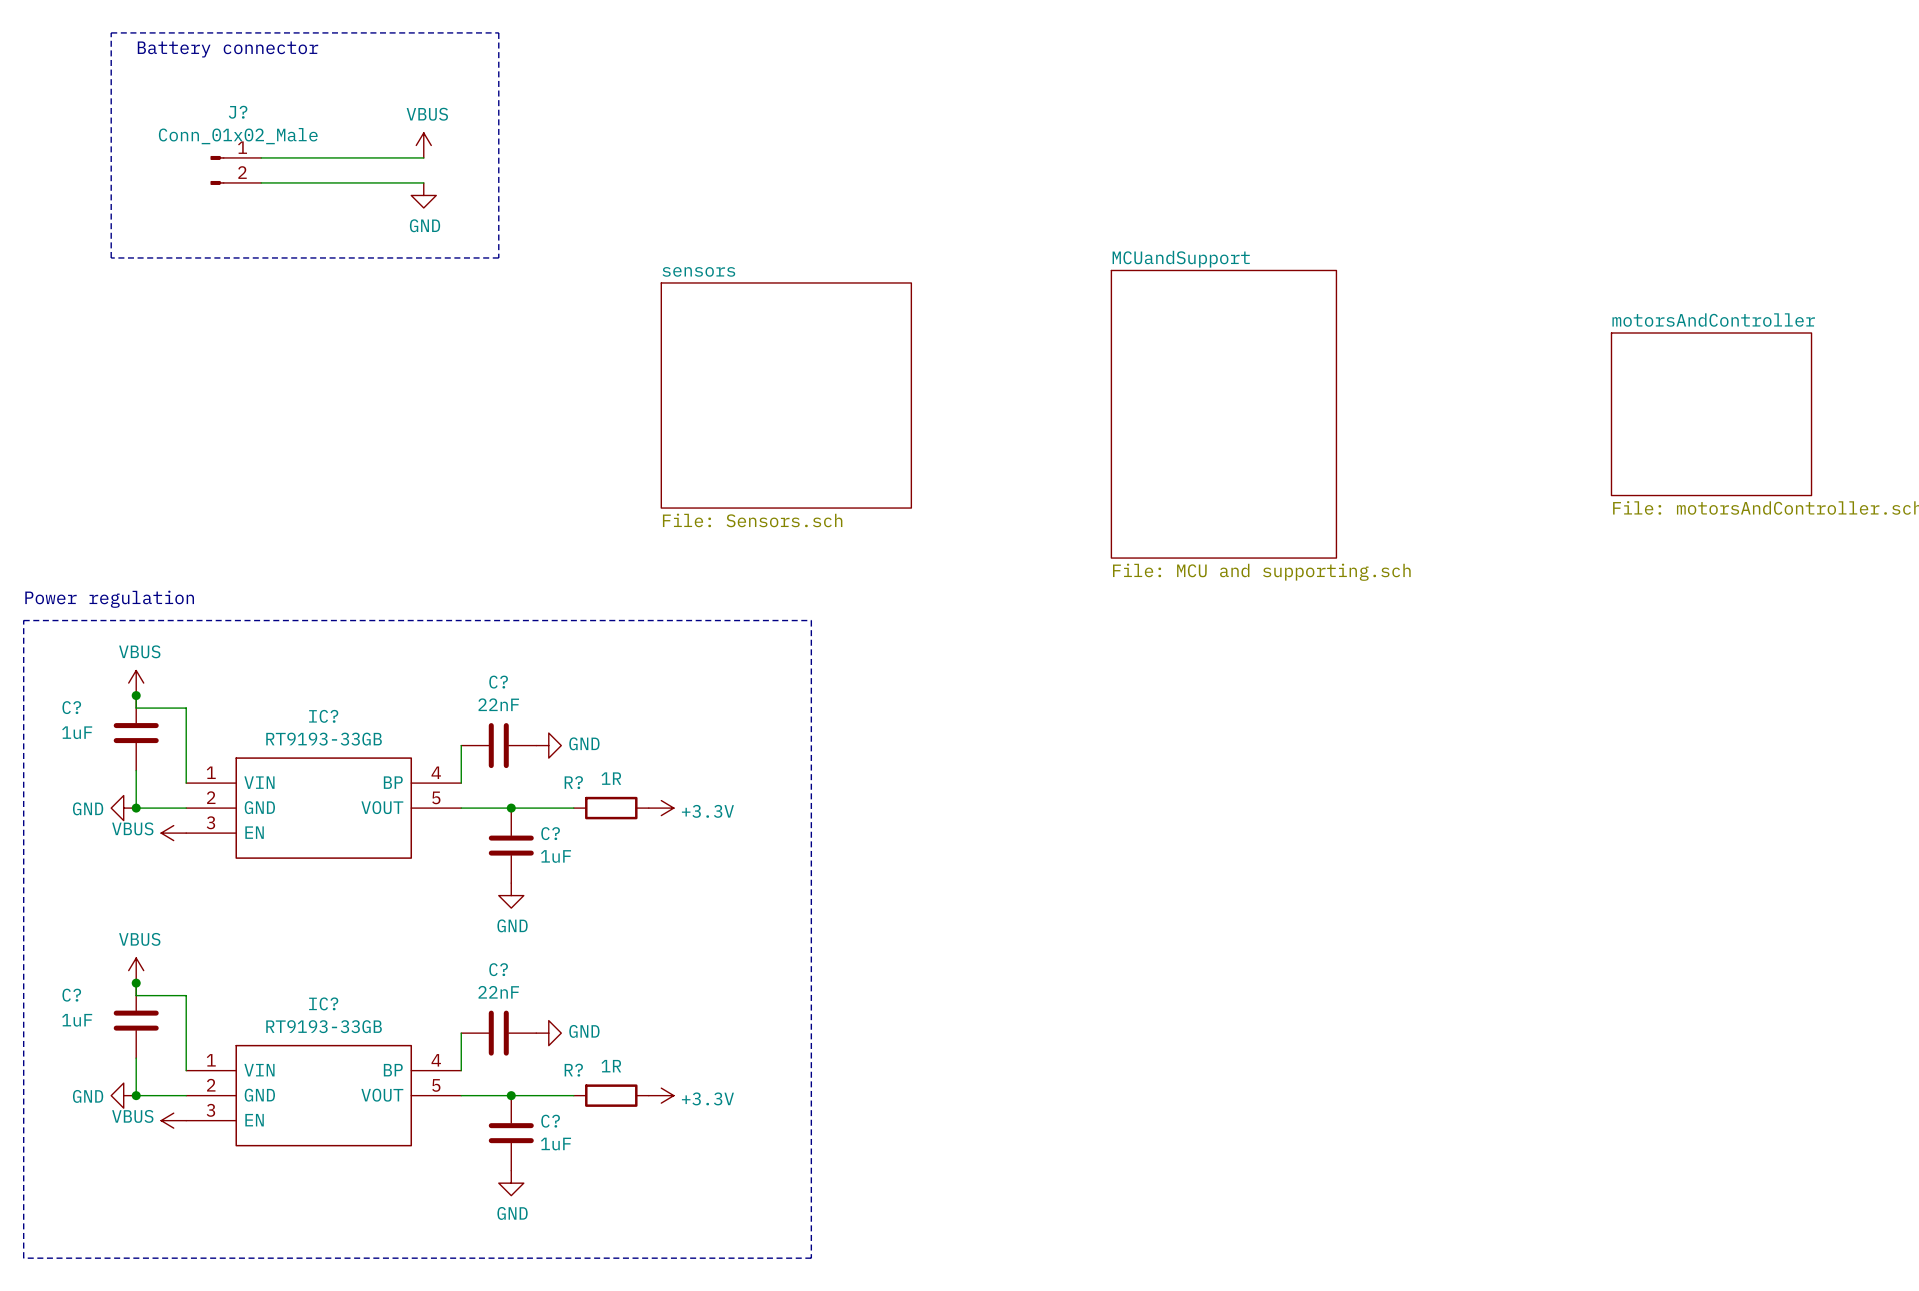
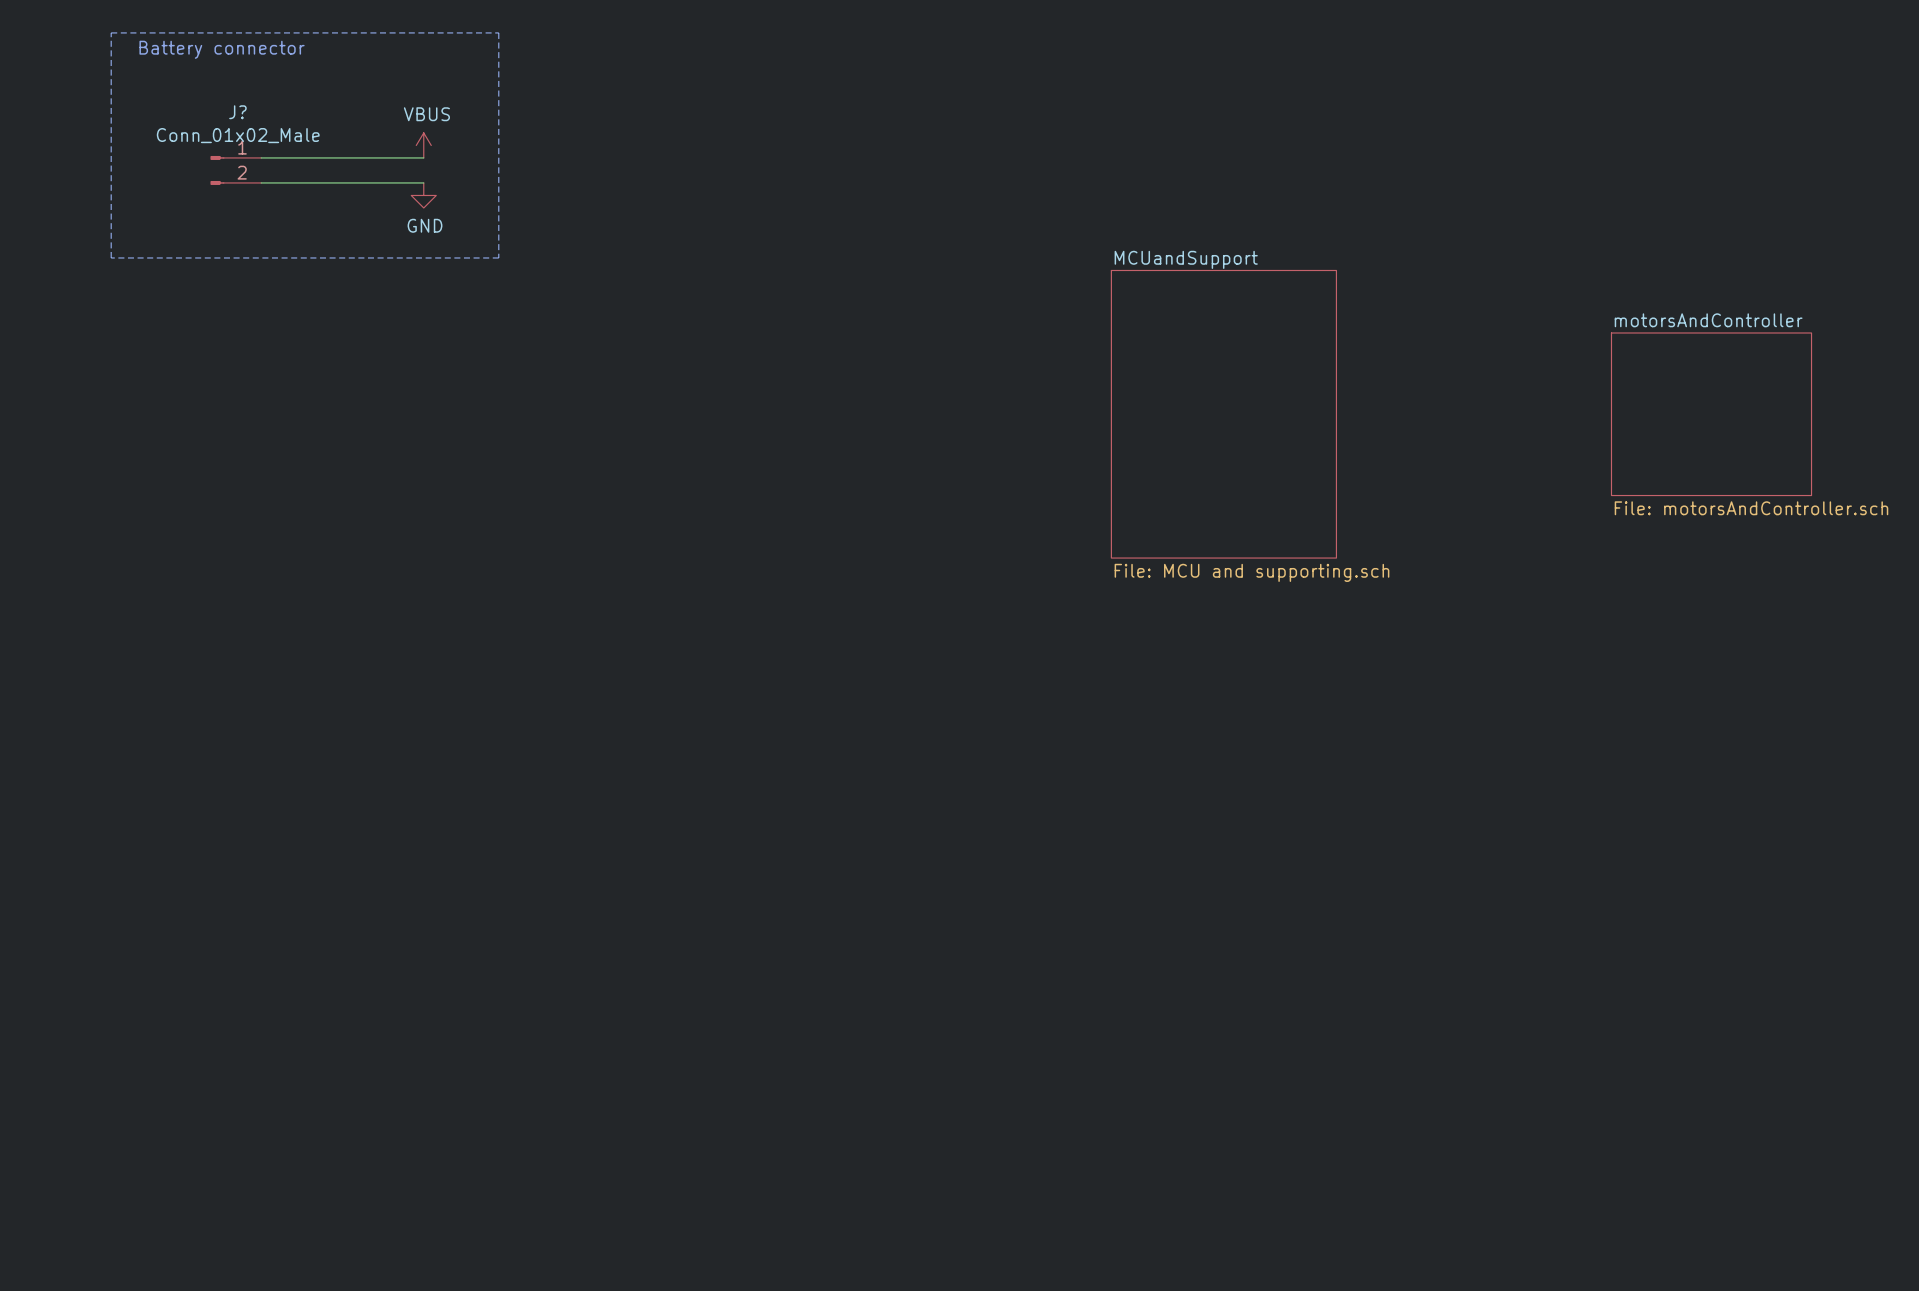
sheet sensors: File: Sensors.sch (786, 395) -> none
text: Power regulation (109, 599) -> none
line: (23, 620) (811, 620) (811, 1258) (23, 1258) (23, 620) -> none
power symbol: VBUS (136, 683) -> none
wire: (136, 695) (136, 708) (186, 708) (186, 783) -> none
junction: (136, 695) -> none
C?: 1uF (136, 733) -> none
wire: (461, 745) (461, 783) -> none
C?: 22nF (498, 745) -> none
power symbol: GND (548, 745) -> none
wire: (136, 770) (136, 808) (186, 808) -> none
power symbol: GND (123, 808) -> none
junction: (136, 808) -> none
IC?: RT9193-33GB (323, 808) -> none
wire: (461, 808) (573, 808) -> none
junction: (511, 808) -> none
R?: 1R (611, 808) -> none
power symbol: +3.3V (661, 808) -> none
power symbol: VBUS (173, 833) -> none
C?: 1uF (511, 845) -> none
power symbol: GND (511, 895) -> none
power symbol: VBUS (136, 970) -> none
wire: (136, 983) (136, 995) (186, 995) (186, 1070) -> none
junction: (136, 983) -> none
C?: 1uF (136, 1020) -> none
wire: (461, 1033) (461, 1070) -> none
C?: 22nF (498, 1033) -> none
power symbol: GND (548, 1033) -> none
wire: (136, 1058) (136, 1095) (186, 1095) -> none
power symbol: GND (123, 1095) -> none
junction: (136, 1095) -> none
IC?: RT9193-33GB (323, 1095) -> none
wire: (461, 1095) (573, 1095) -> none
junction: (511, 1095) -> none
R?: 1R (611, 1095) -> none
power symbol: +3.3V (661, 1095) -> none
power symbol: VBUS (173, 1120) -> none
C?: 1uF (511, 1133) -> none
power symbol: GND (511, 1183) -> none

